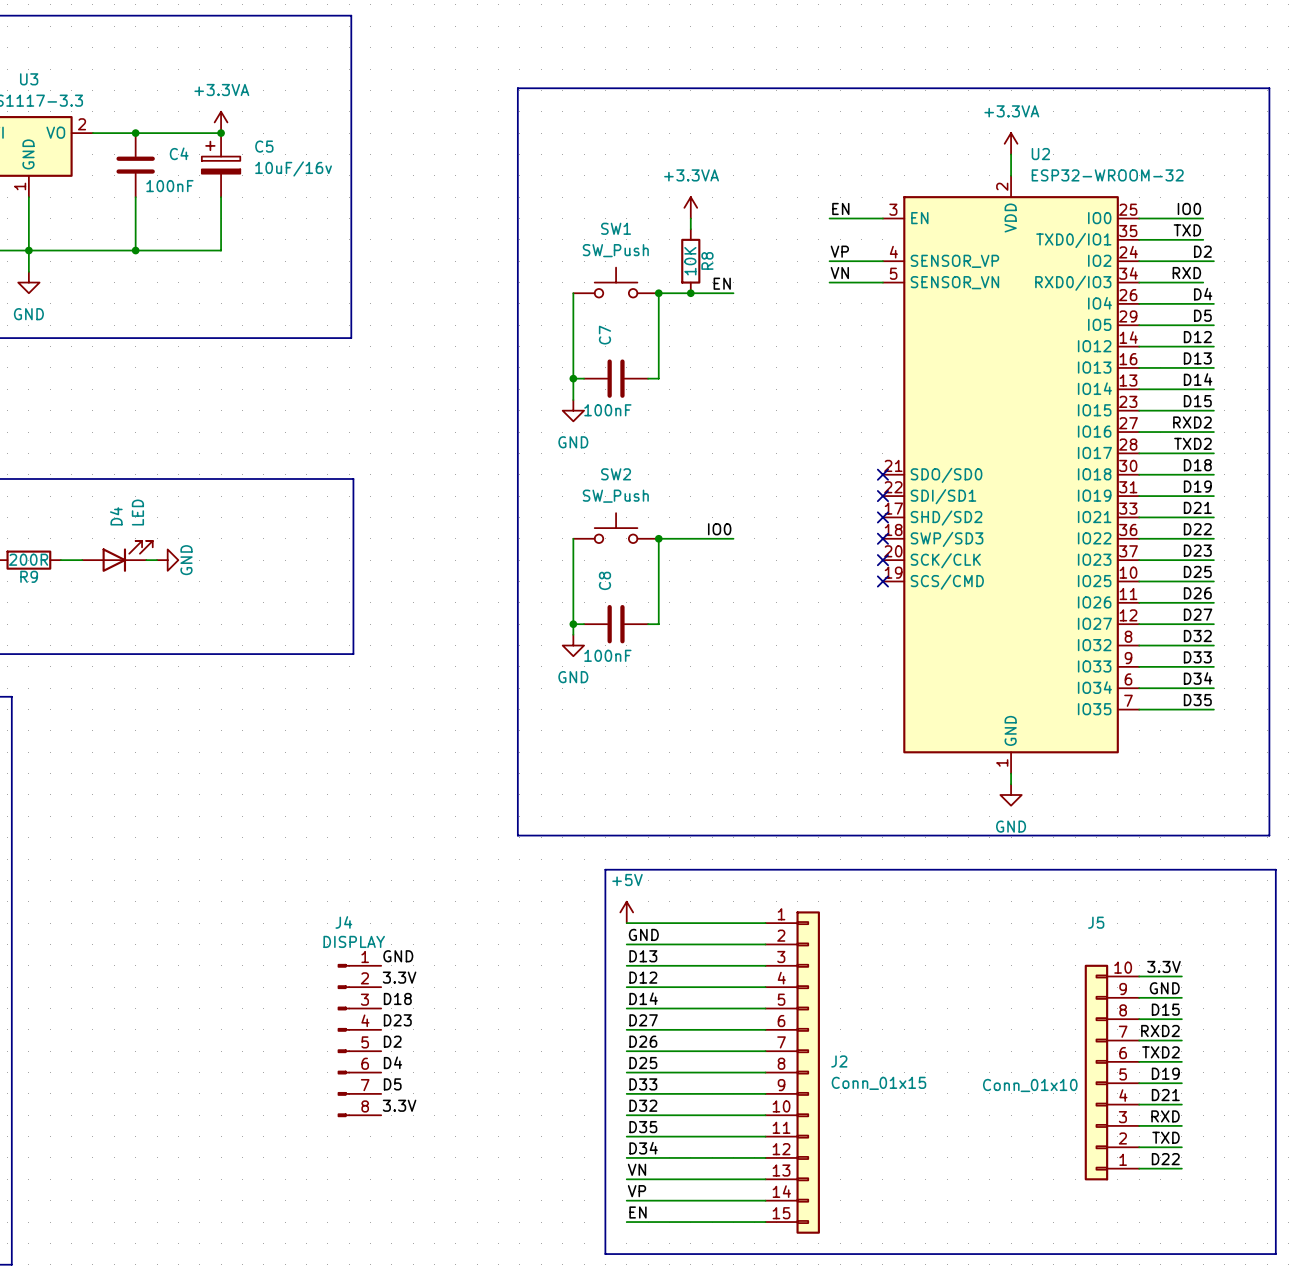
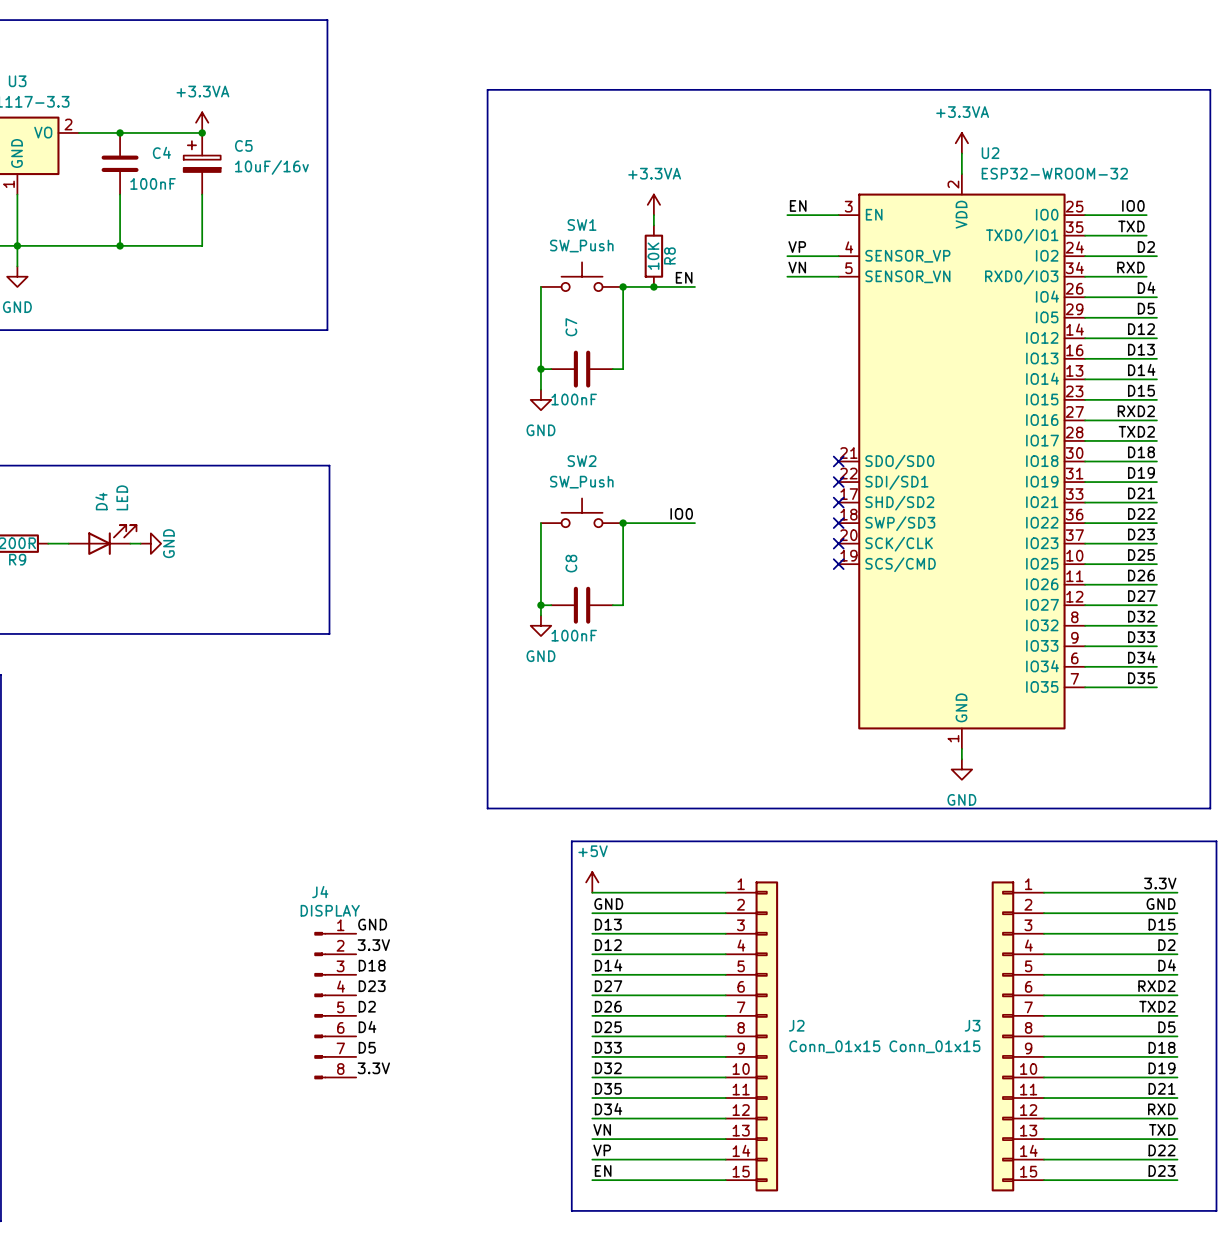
wire: none -> (1044, 892) (1177, 892)
wire: none -> (1044, 913) (1177, 913)
wire: none -> (1044, 933) (1177, 933)
label position: 3.3V (1164, 966) -> 3.3V (1160, 883)
wire: (1139, 976) (1181, 976) -> none
label: none -> D2 (1166, 945)
wire: none -> (1044, 954) (1177, 954)
label position: GND (1164, 988) -> GND (1161, 904)
wire: (1139, 997) (1181, 997) -> none
label: none -> D4 (1167, 965)
wire: none -> (1044, 974) (1177, 974)
label position: D15 (1165, 1009) -> D15 (1162, 924)
wire: (1139, 1019) (1181, 1019) -> none
wire: none -> (1044, 995) (1177, 995)
label position: RXD2 (1160, 1031) -> RXD2 (1156, 986)
wire: (1139, 1040) (1181, 1040) -> none
wire: none -> (1044, 1015) (1177, 1015)
label position: TXD2 (1160, 1052) -> TXD2 (1157, 1006)
wire: (1139, 1061) (1181, 1061) -> none
label: none -> D5 (1166, 1027)
J3: none -> Conn_01x15 (1017, 1036)
wire: none -> (1044, 1036) (1177, 1036)
J5: Conn_01x10 (1111, 1072) -> none
label position: D19 (1165, 1073) -> D19 (1162, 1068)
wire: (1139, 1083) (1181, 1083) -> none
label: none -> D18 (1162, 1047)
wire: none -> (1044, 1056) (1177, 1056)
label position: D21 (1165, 1095) -> D21 (1162, 1088)
wire: (1139, 1104) (1181, 1104) -> none
wire: none -> (1044, 1077) (1177, 1077)
label position: RXD (1165, 1116) -> RXD (1161, 1109)
wire: (1139, 1125) (1181, 1125) -> none
wire: none -> (1044, 1098) (1177, 1098)
label position: TXD (1166, 1137) -> TXD (1162, 1129)
wire: (1139, 1147) (1181, 1147) -> none
wire: none -> (1044, 1118) (1177, 1118)
label position: D22 (1165, 1159) -> D22 (1162, 1150)
wire: (1139, 1168) (1181, 1168) -> none
wire: none -> (1044, 1139) (1177, 1139)
wire: none -> (1044, 1159) (1177, 1159)
label: none -> D23 (1162, 1170)
wire: none -> (1044, 1180) (1177, 1180)

